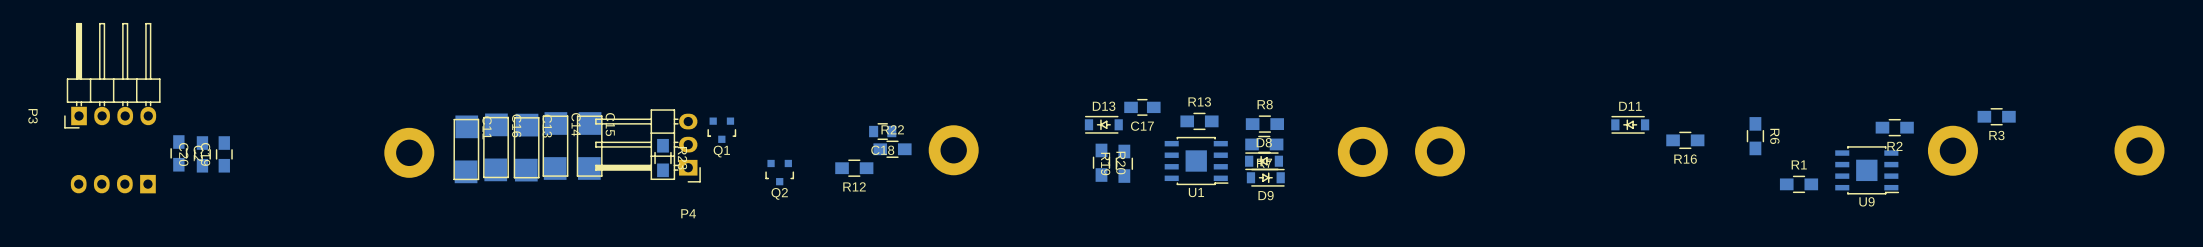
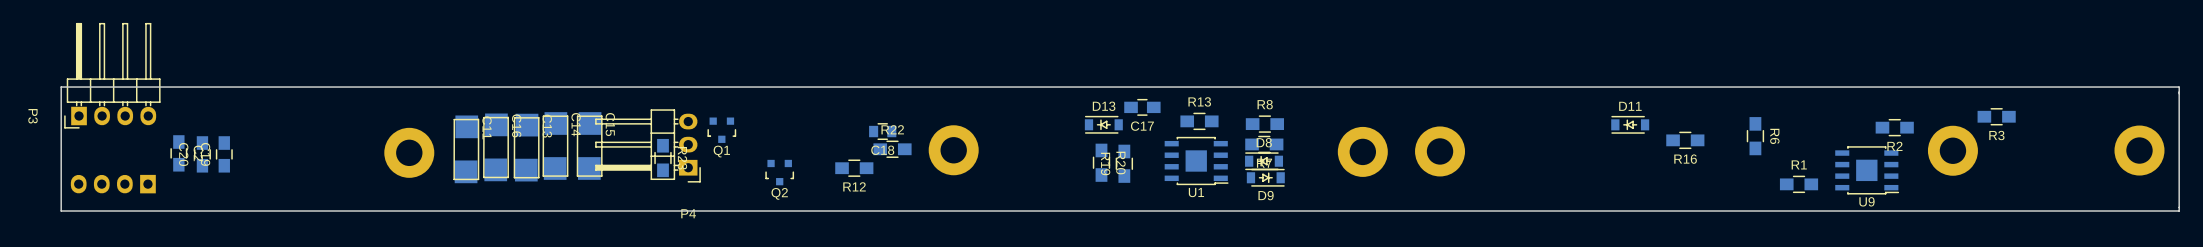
board edge: none -> (2178, 87) (61, 87) (61, 211) (2179, 211) (2179, 93)
board edge: none -> (2179, 87) (2179, 93)

